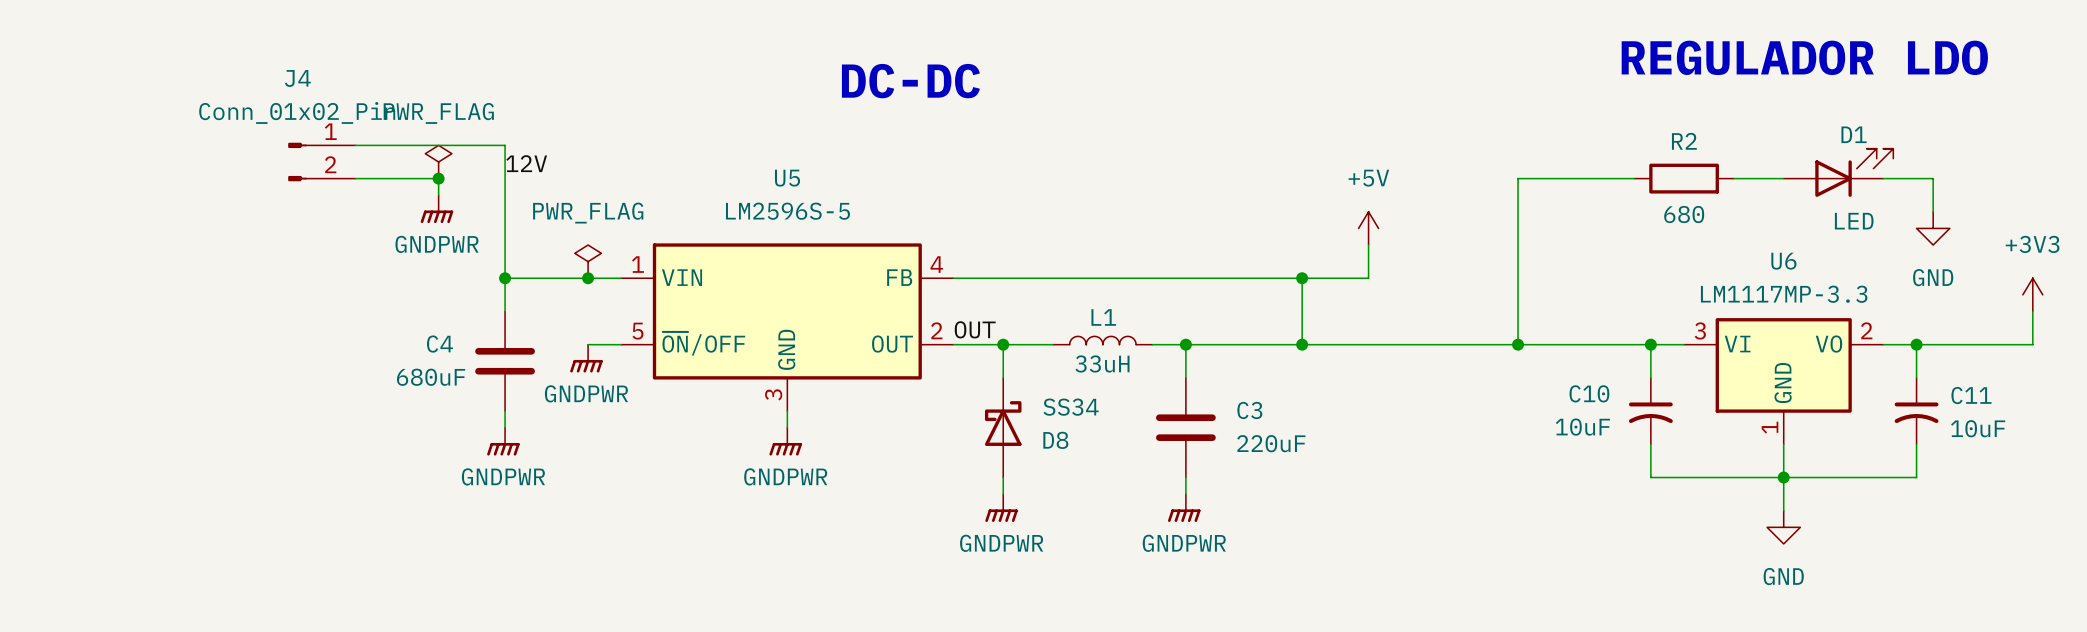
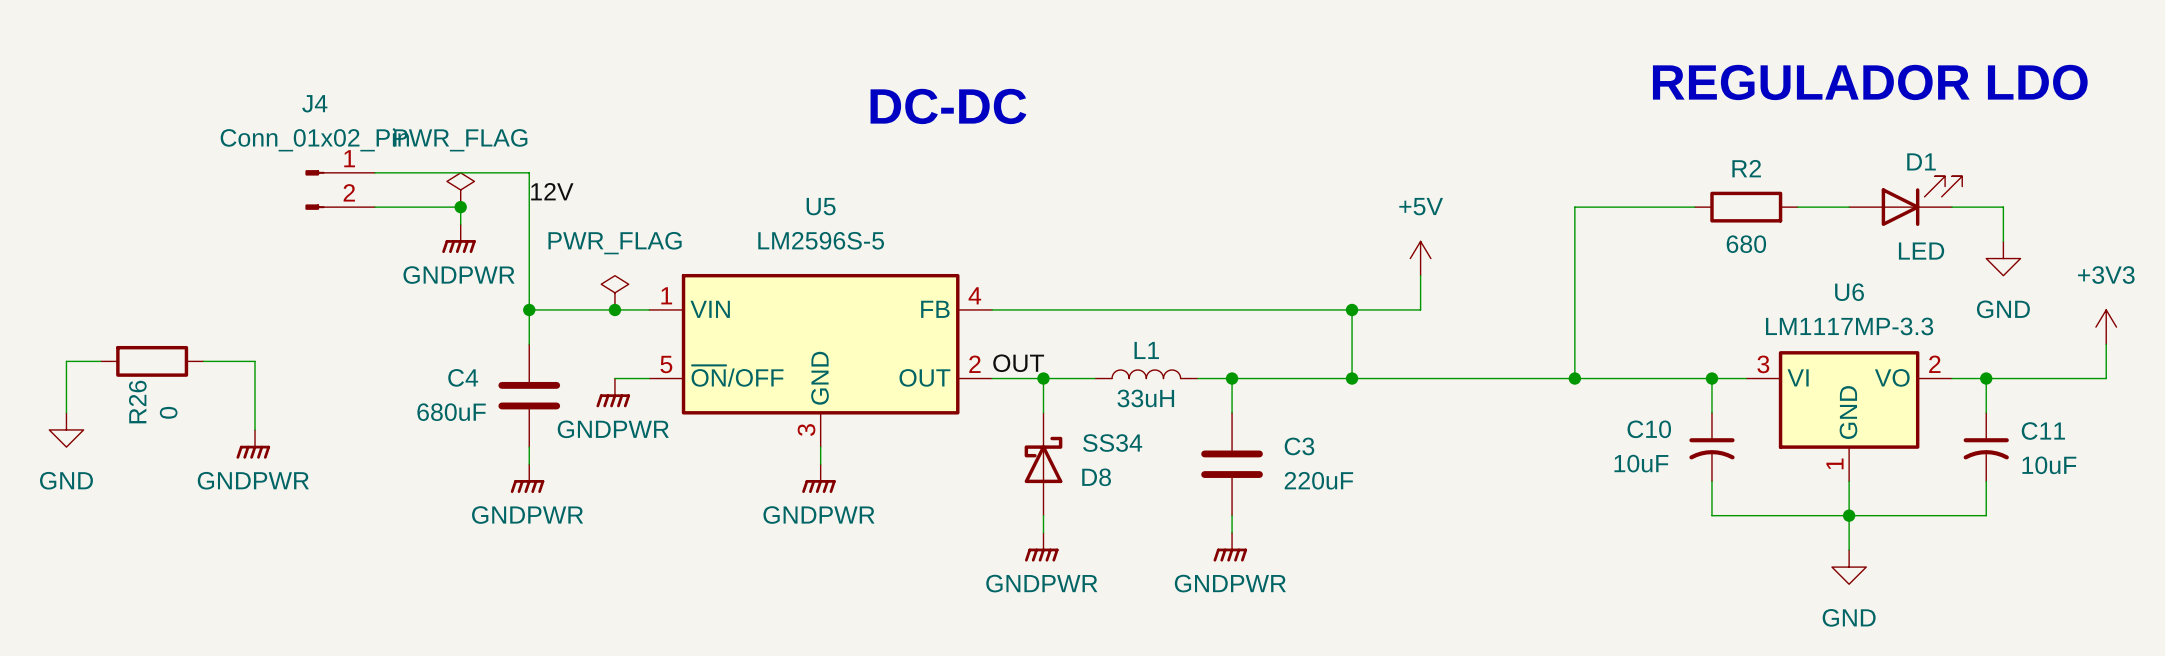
wire: none -> (100, 361) (66, 361) (66, 412)
R26: none -> 0 (152, 361)
wire: none -> (203, 361) (255, 361) (255, 429)
power symbol: none -> GND (66, 429)
power symbol: none -> GNDPWR (253, 444)

